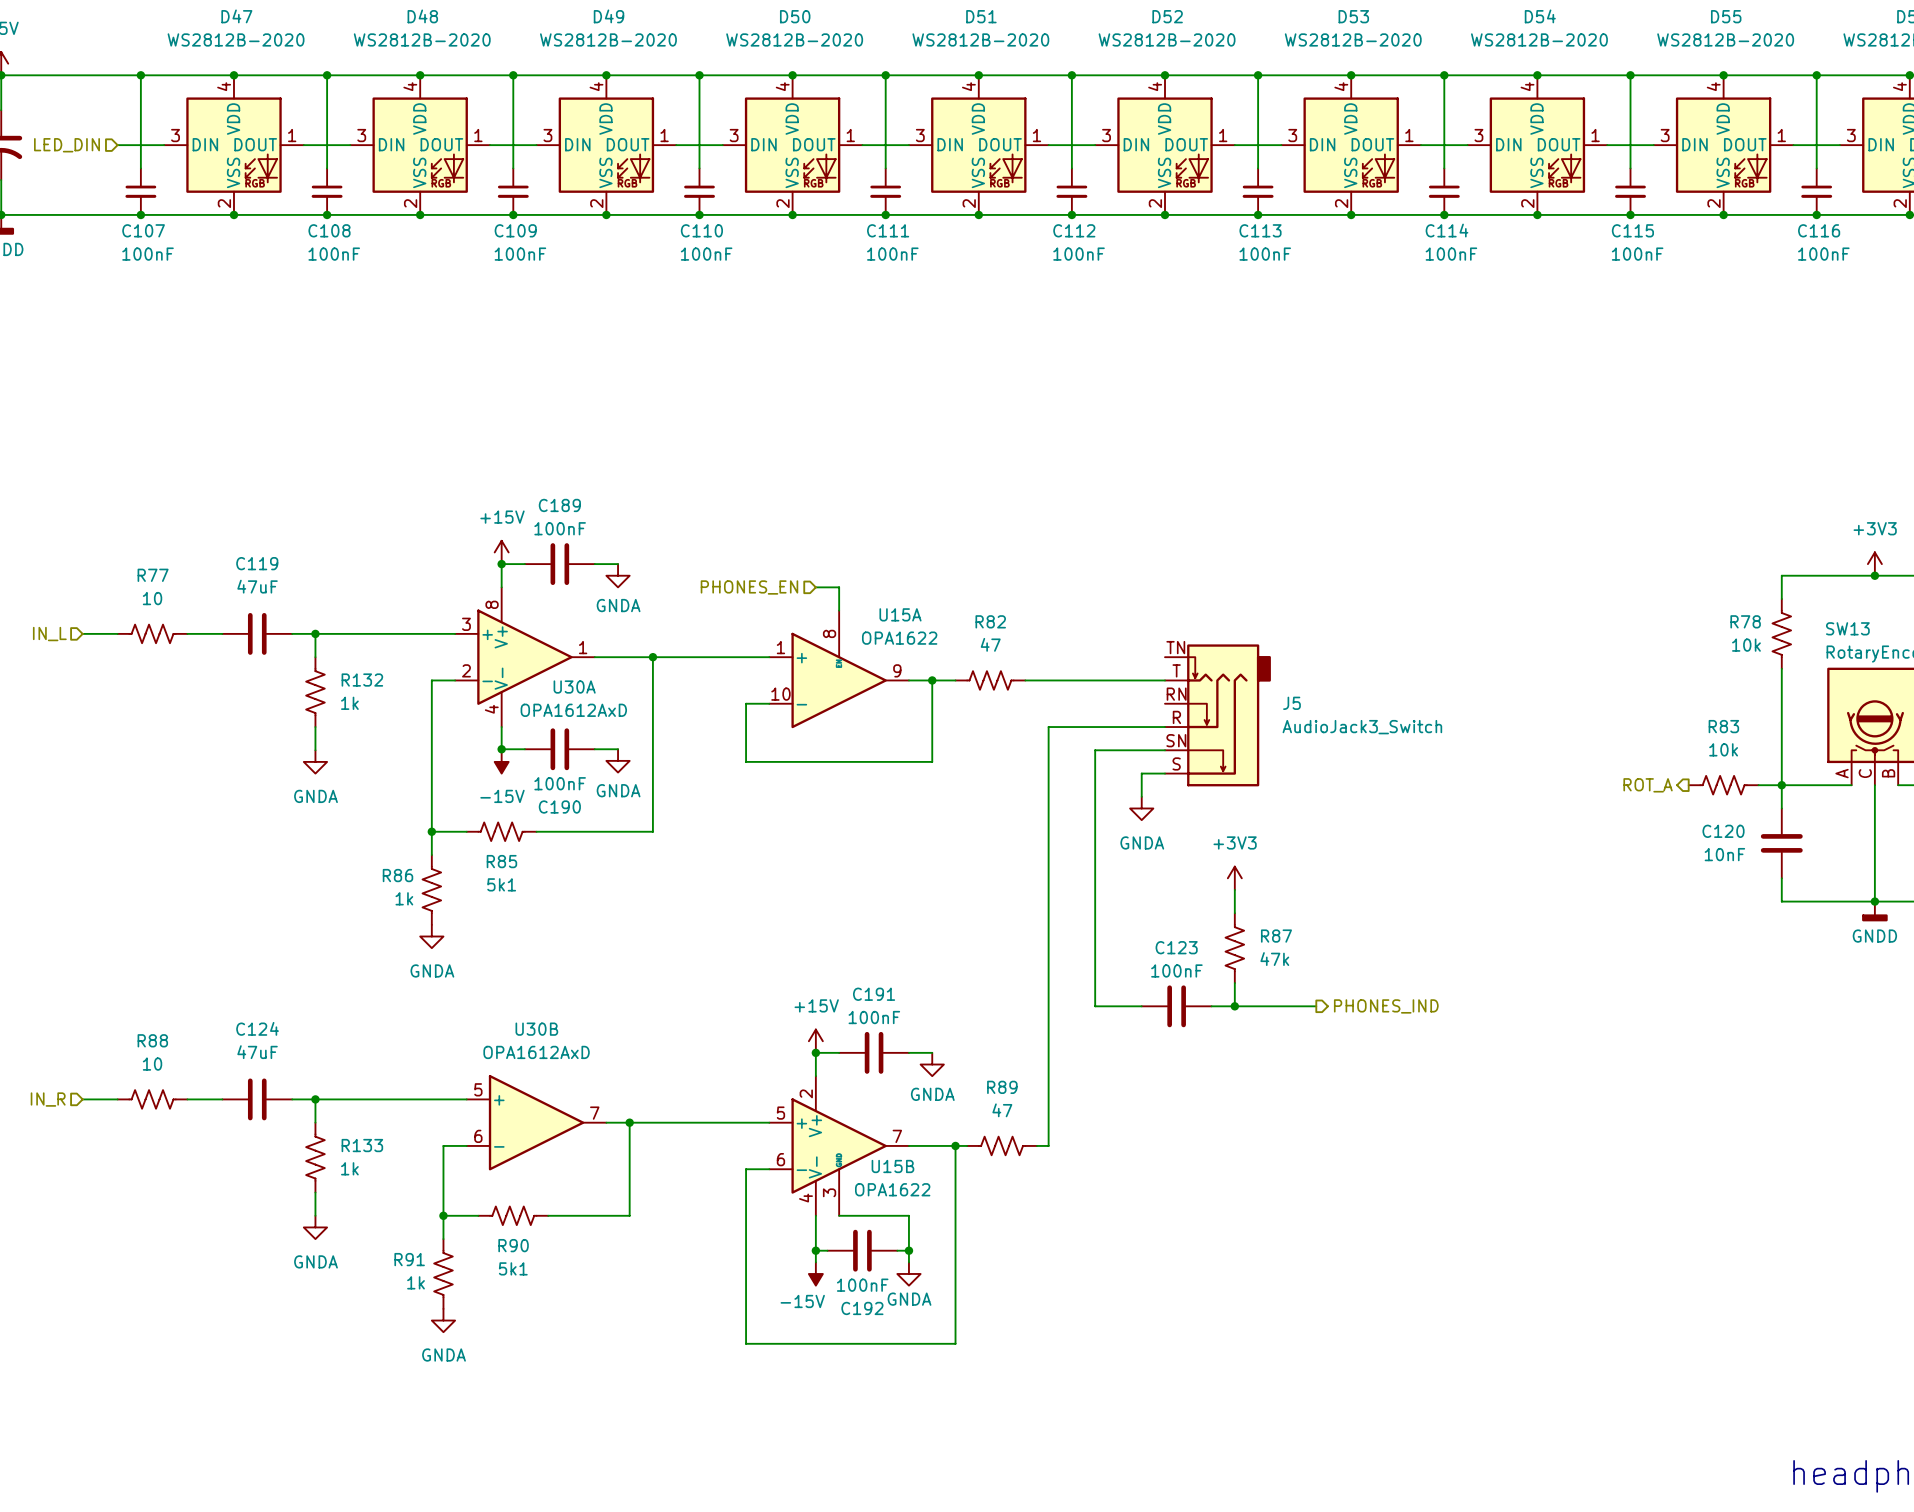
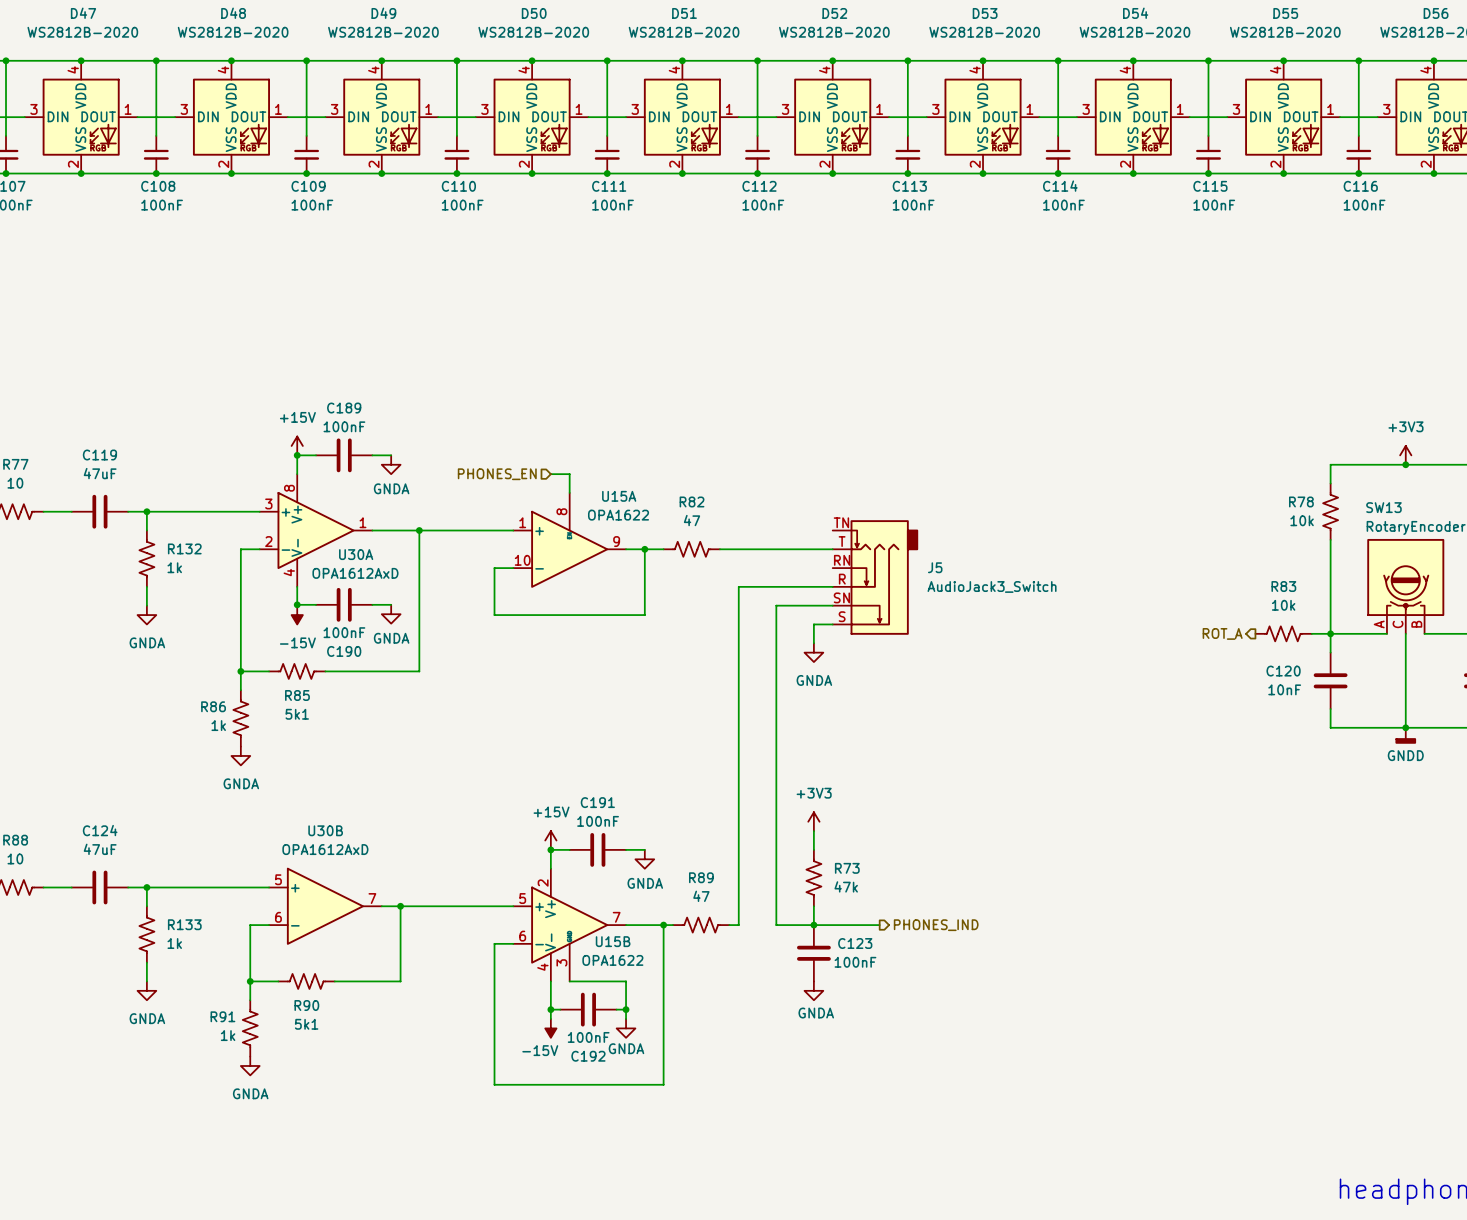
power symbol position: +3V3 (1234, 878) -> +3V3 (813, 821)
wire: (1234, 889) (1234, 913) -> (813, 831) (813, 849)
R87: 47k (1234, 948) -> none
C123 value position: 100nF (1176, 970) -> 100nF (855, 962)
wire: (1234, 983) (1234, 1006) -> (813, 906) (813, 925)
wire: (1095, 1006) (1141, 1006) -> (776, 812) (776, 925) (879, 925)
C123 rotation: 0° (1176, 1006) -> 90° clockwise (813, 953)
C123 position: (1176, 1006) -> (813, 953)
wire: (1211, 1006) (1316, 1006) -> none
junction: (1234, 1006) -> none
hierarchical label position: PHONES_IND (1386, 1006) -> PHONES_IND (936, 925)
R73: none -> 47k (813, 878)
junction: none -> (813, 925)
power symbol: none -> GNDA (813, 990)

